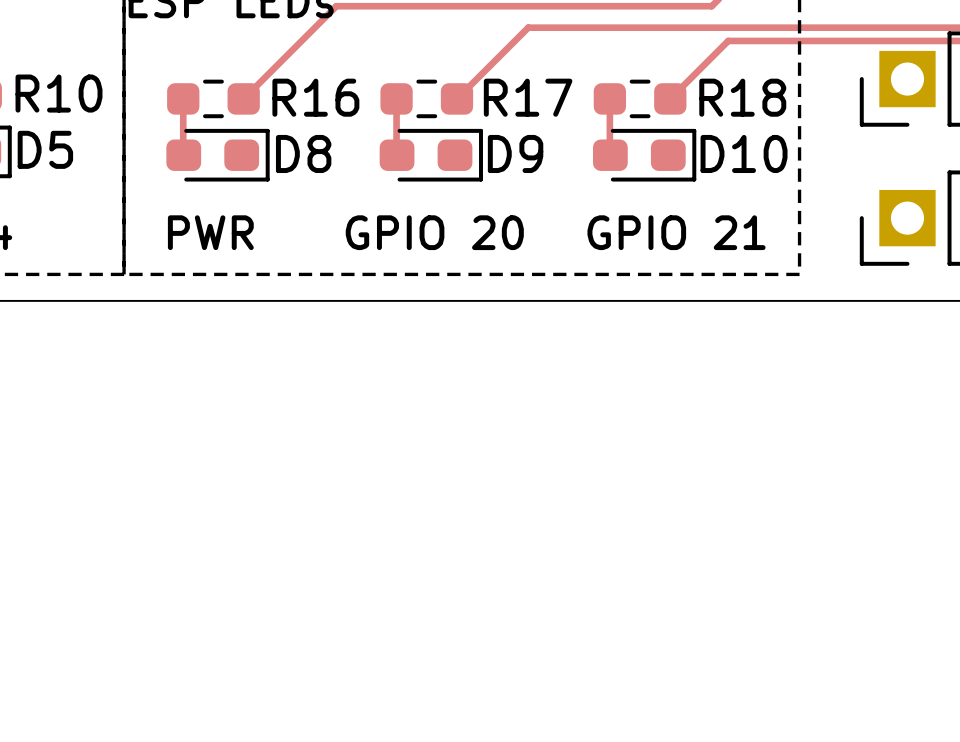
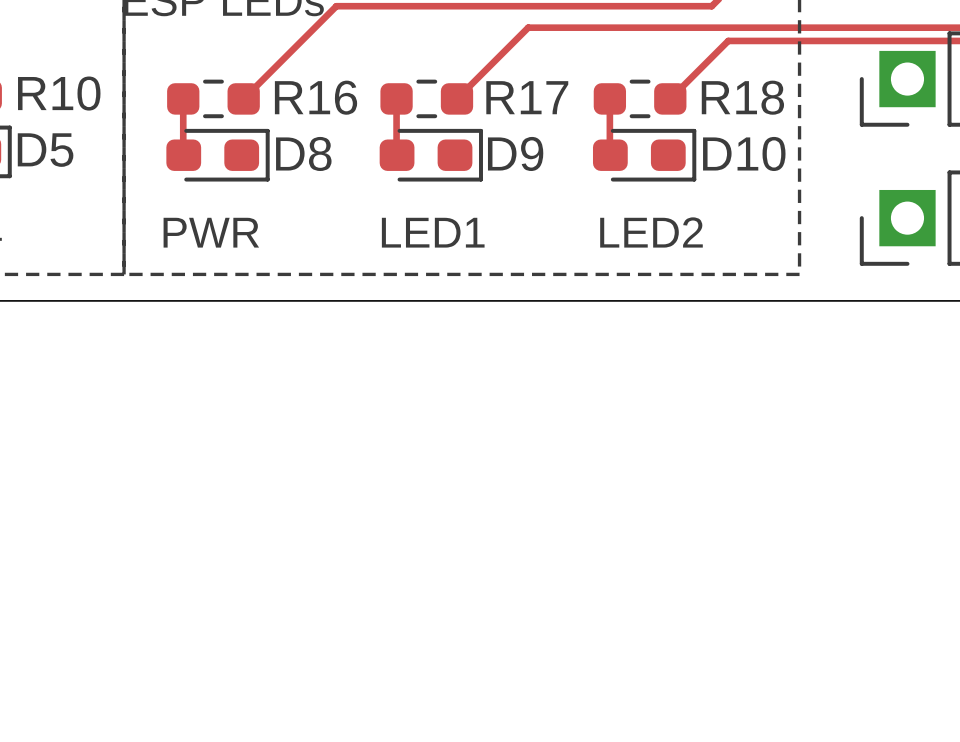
text: GPIO 20 (434, 232) -> none
text: none -> LED1 (433, 232)
text: GPIO 21 (676, 232) -> LED2 (651, 232)

